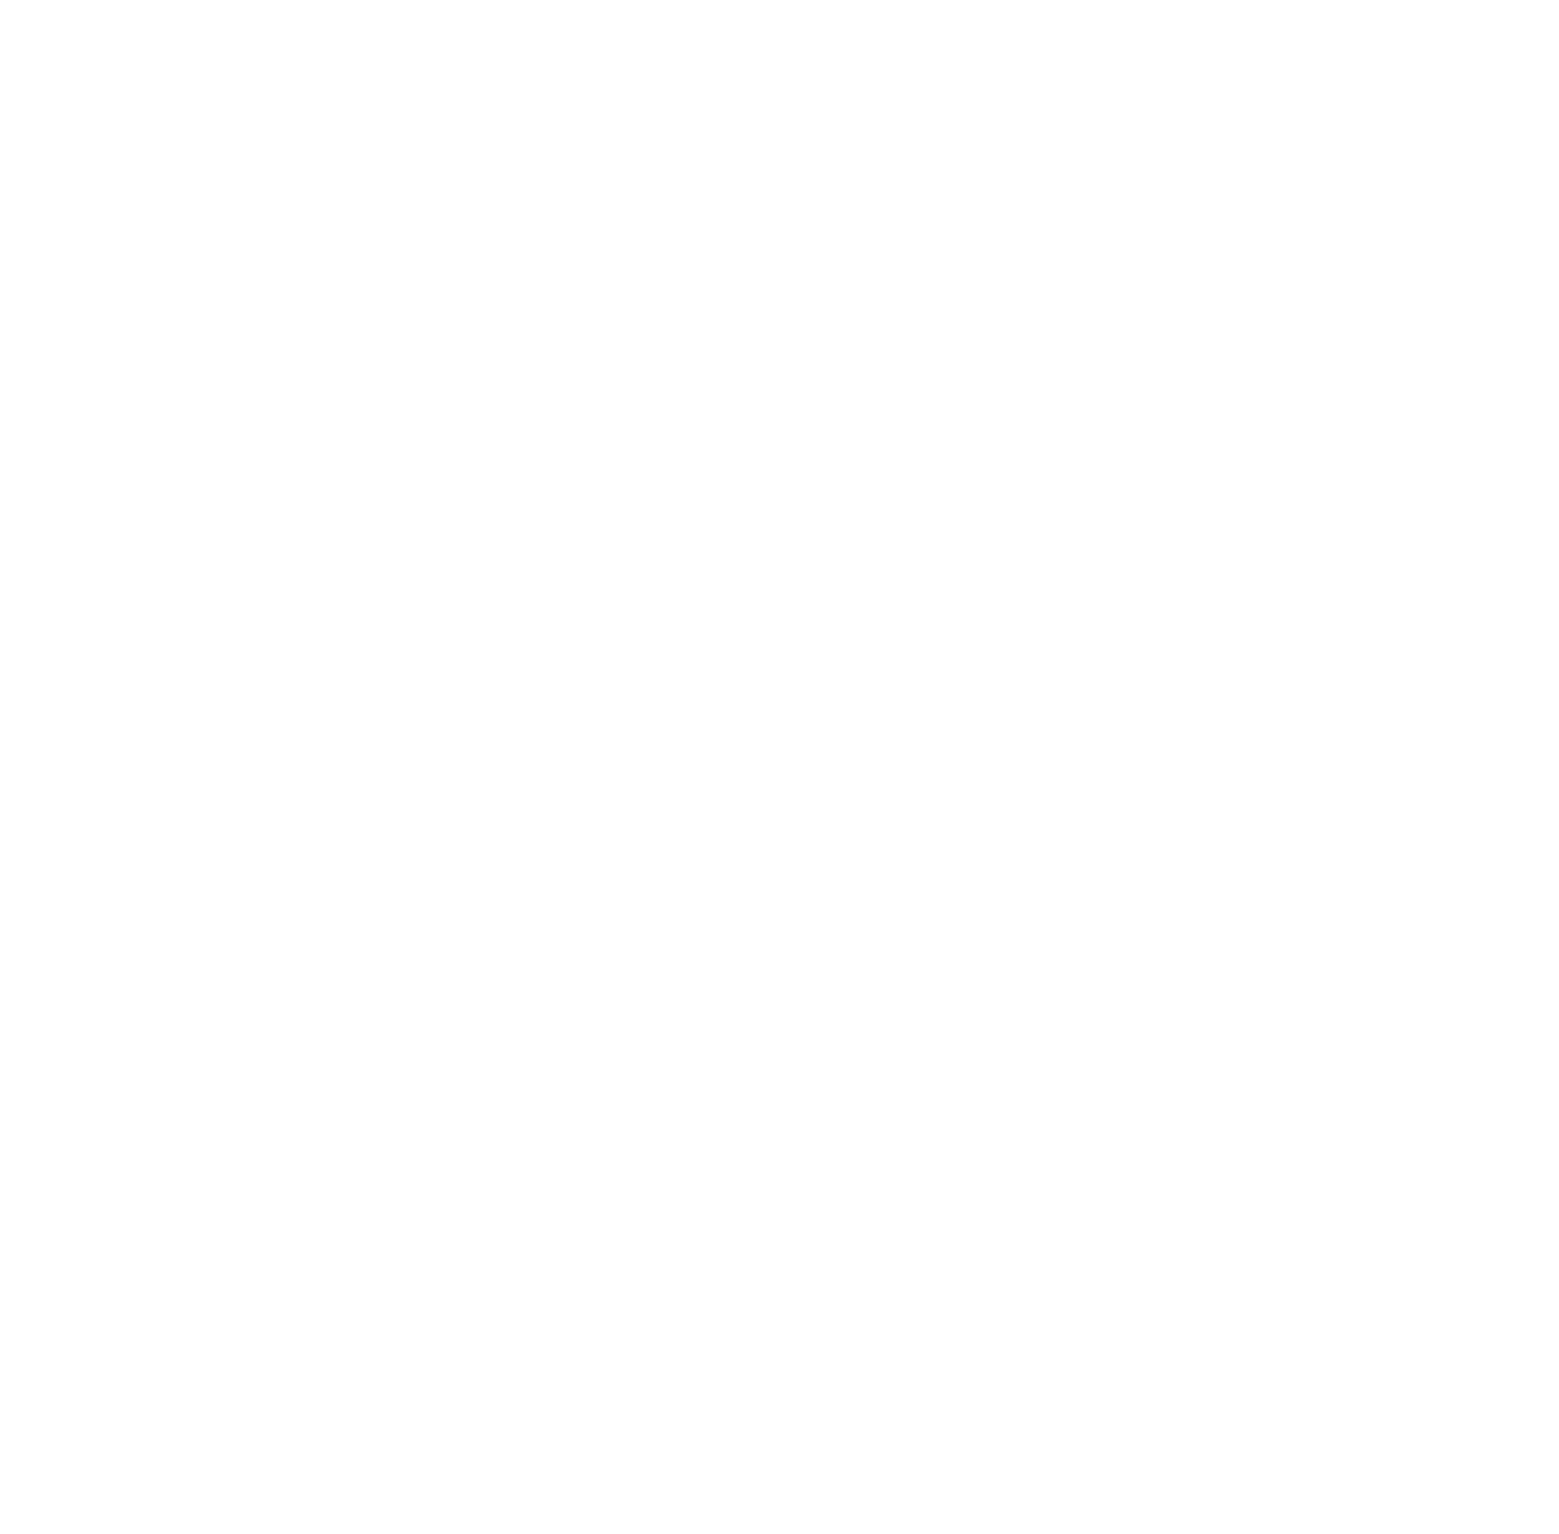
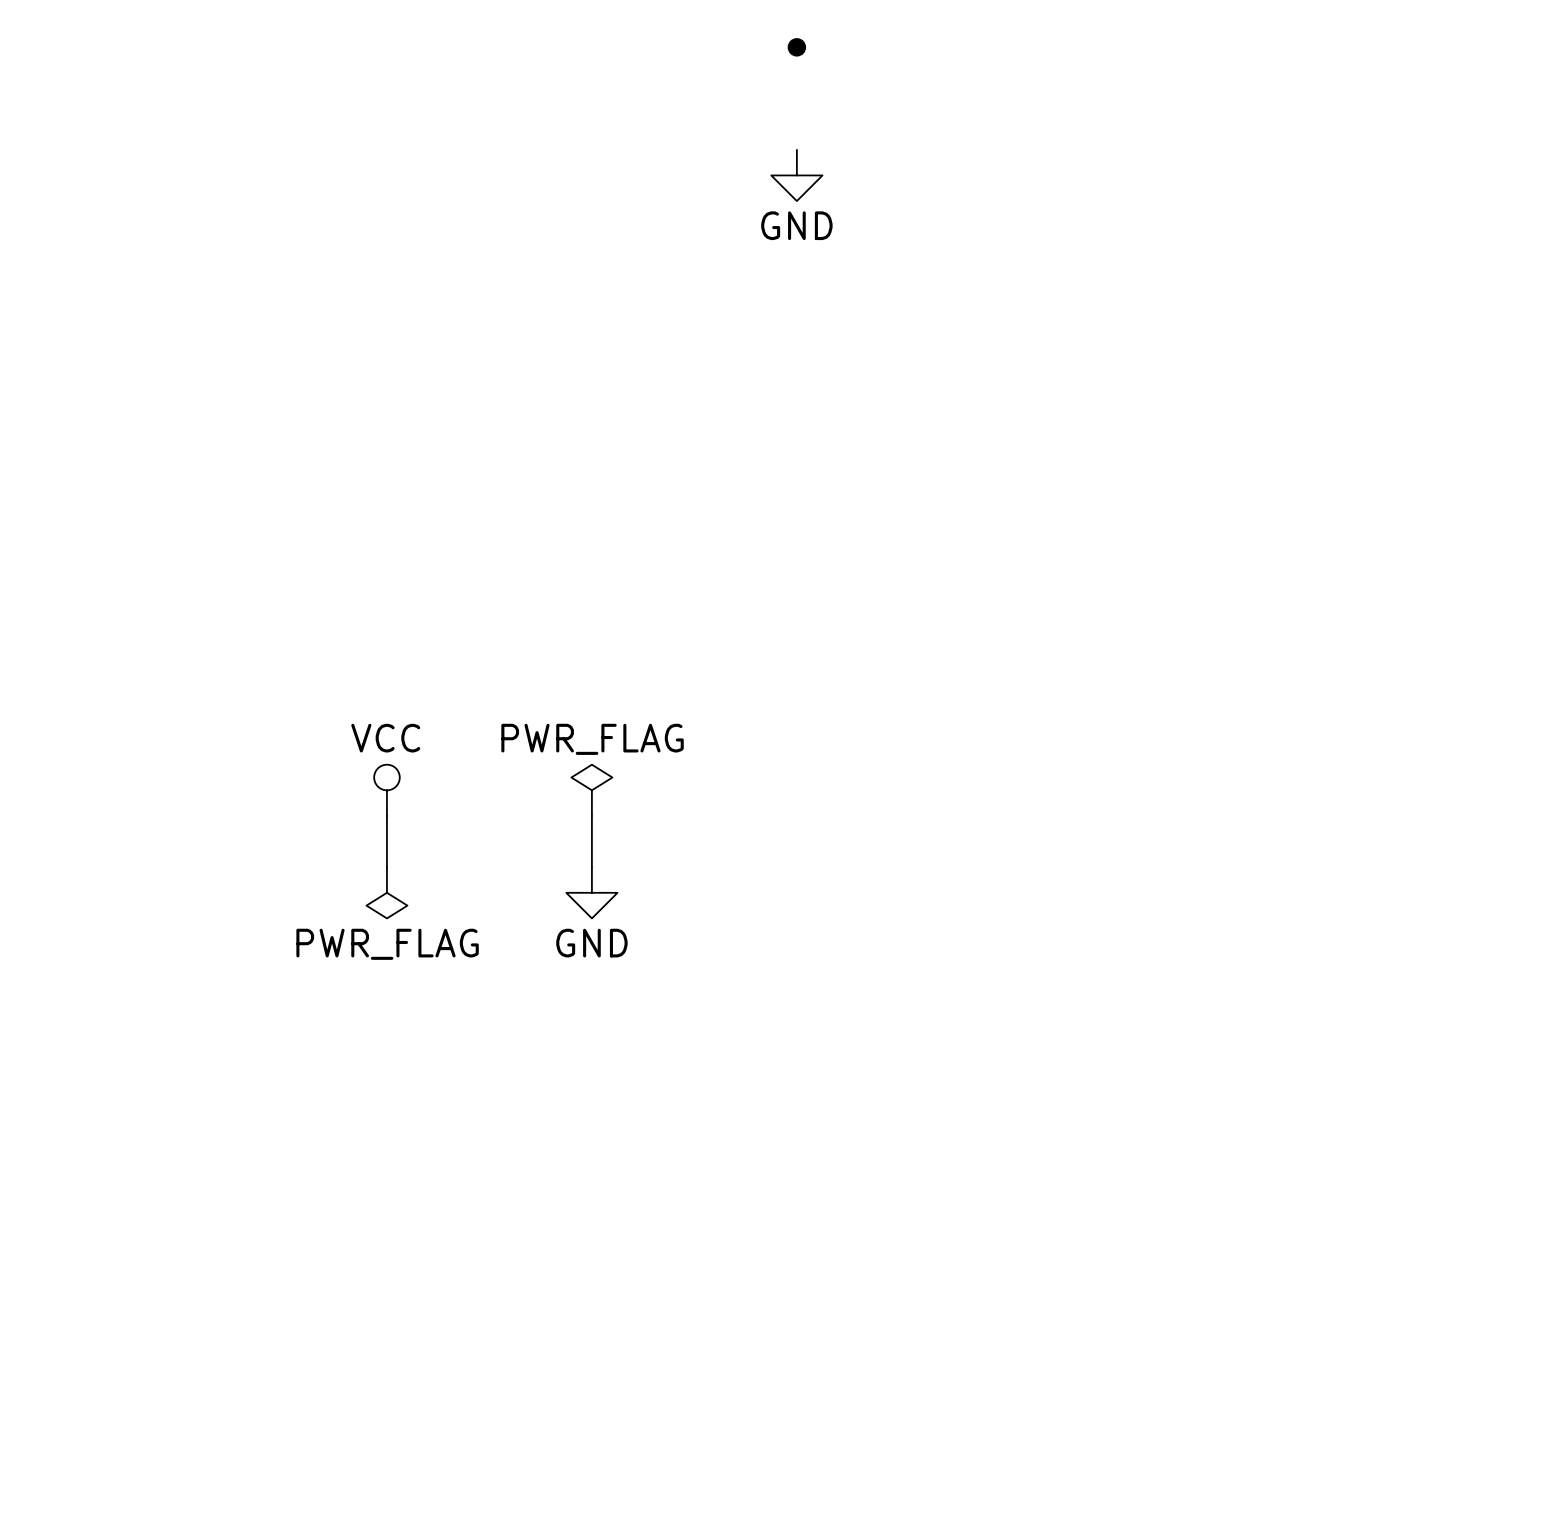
junction: none -> (796, 47)
power symbol: none -> GND (796, 175)
power symbol: none -> VCC (386, 790)
power symbol: none -> PWR_FLAG (591, 790)
wire: none -> (386, 815) (386, 867)
wire: none -> (591, 815) (591, 867)
power symbol: none -> PWR_FLAG (386, 892)
power symbol: none -> GND (591, 892)

